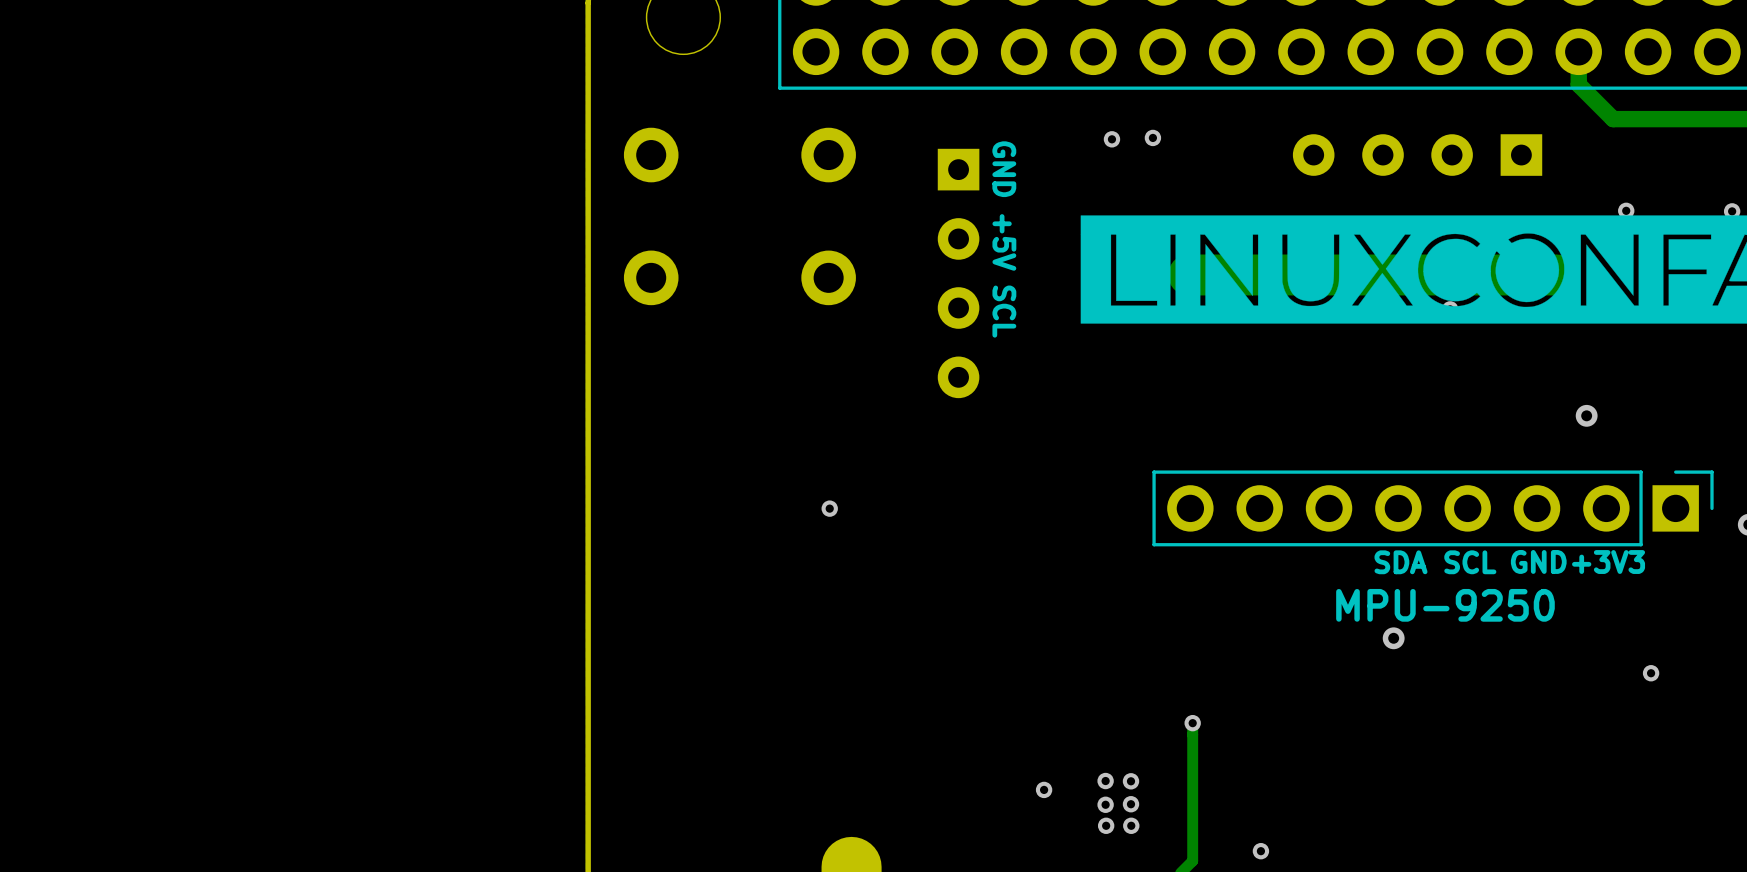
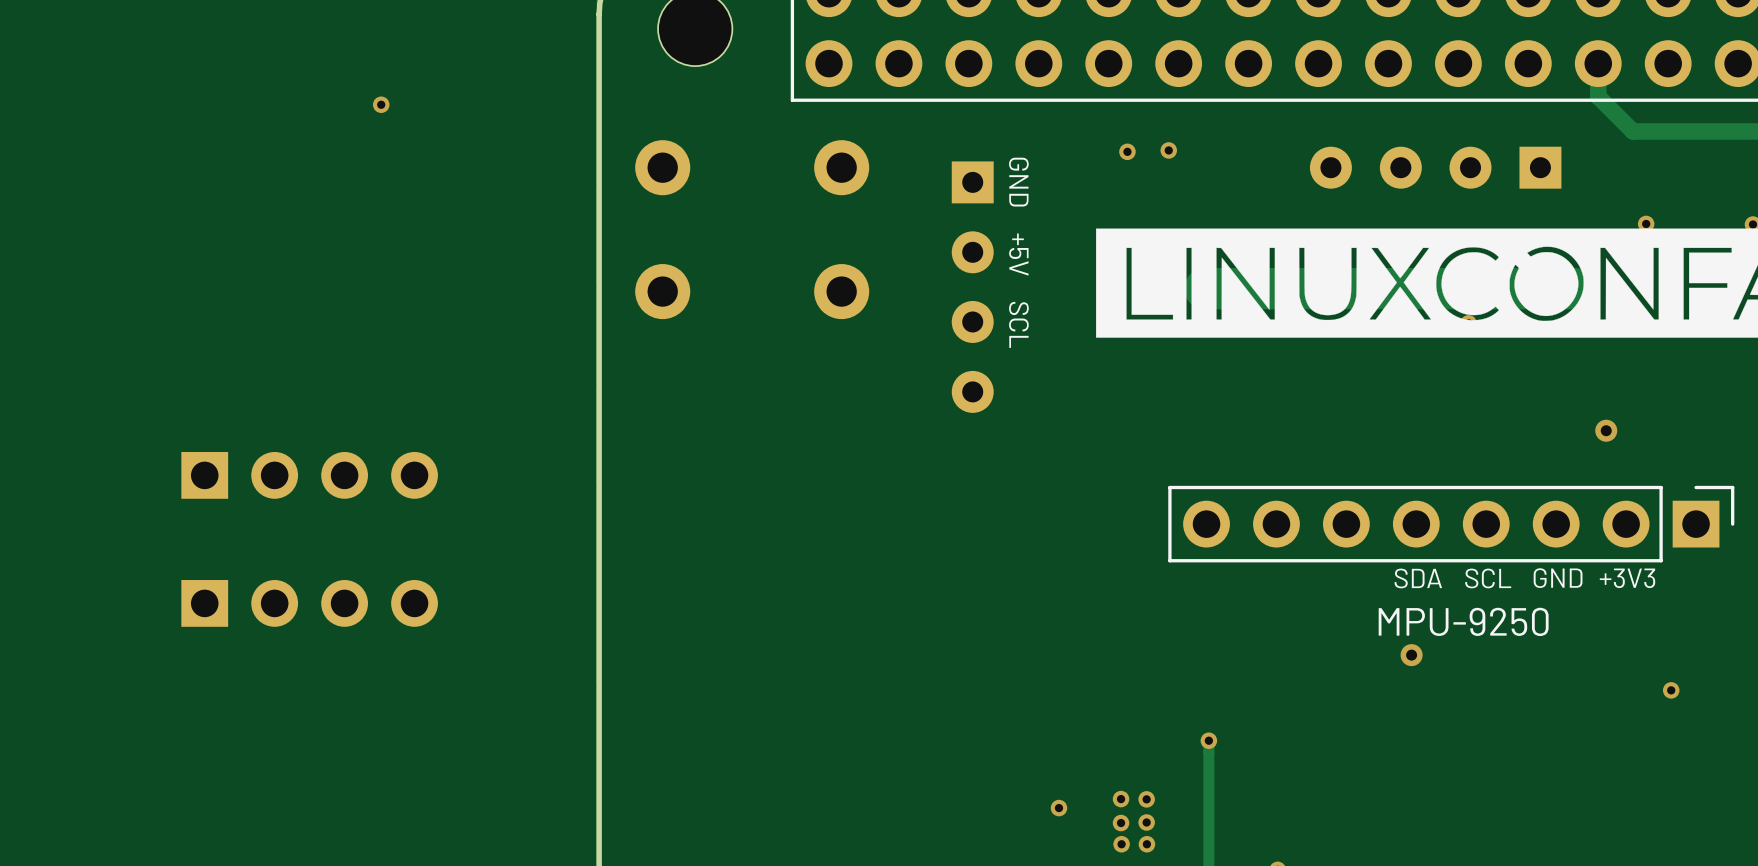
via: none -> (381, 104)
part: none -> (309, 475)
via: (829, 508) -> none
part: none -> (309, 603)

